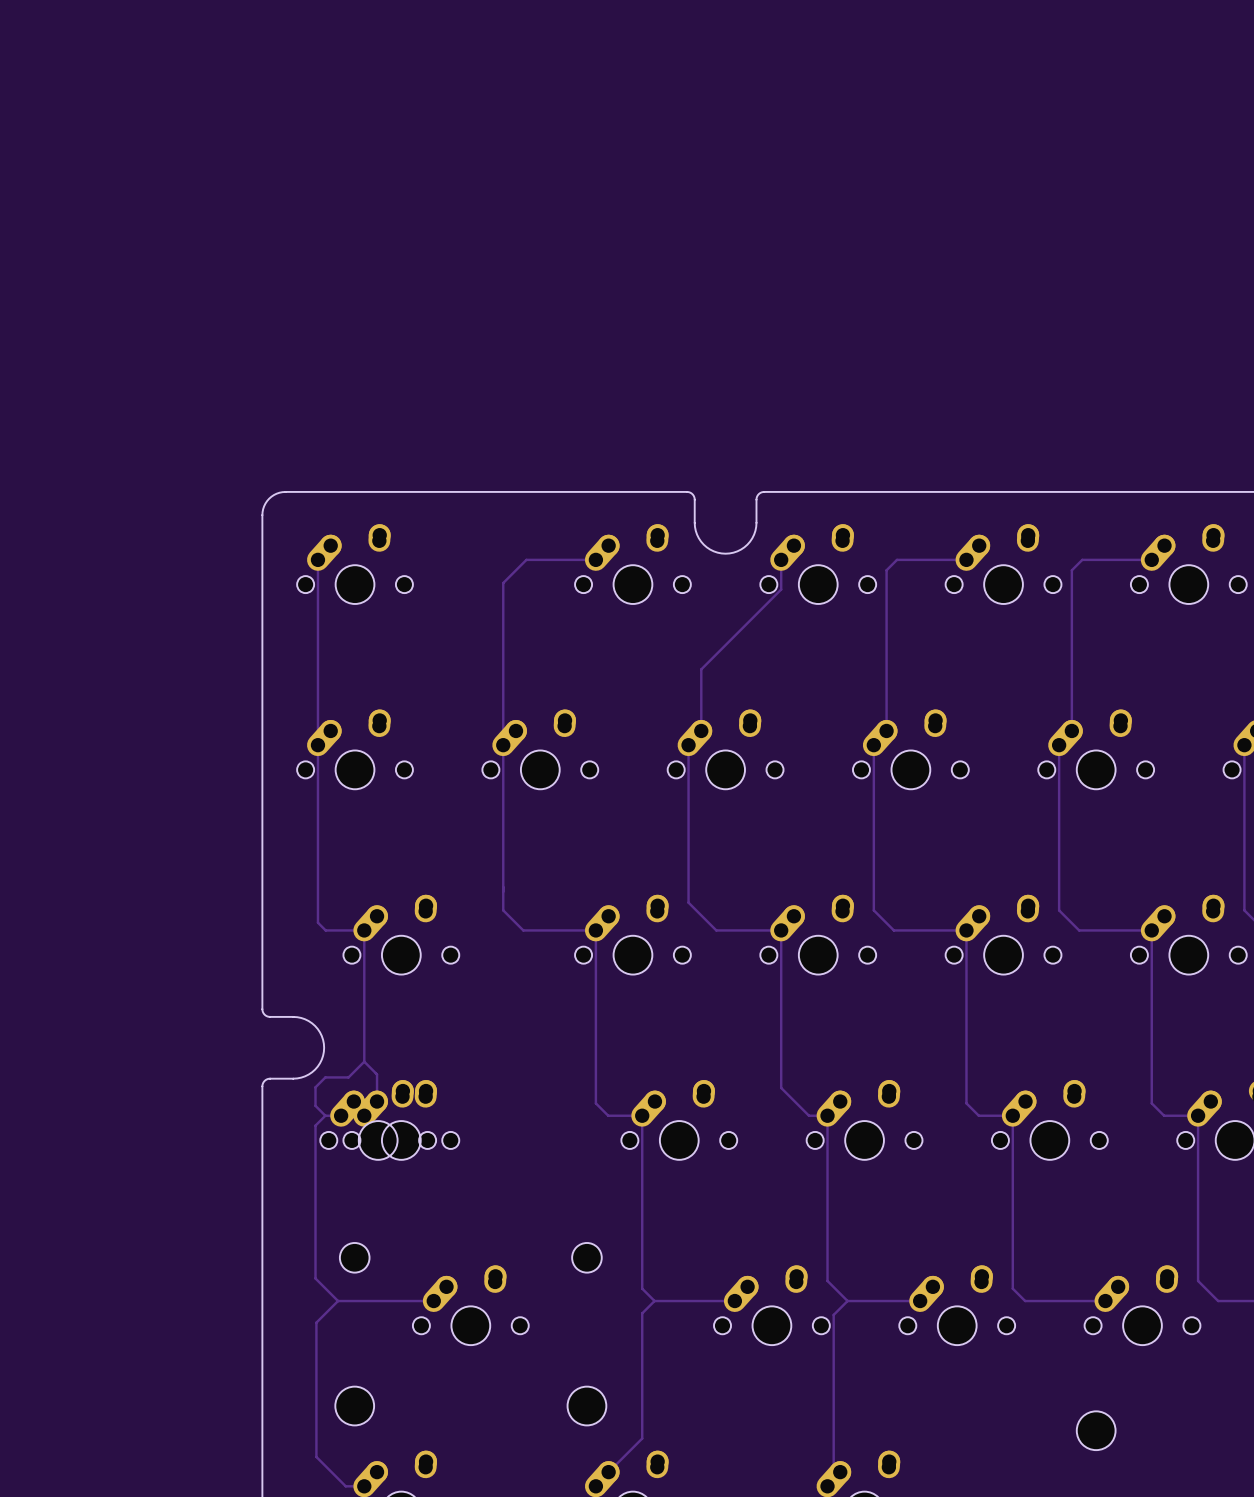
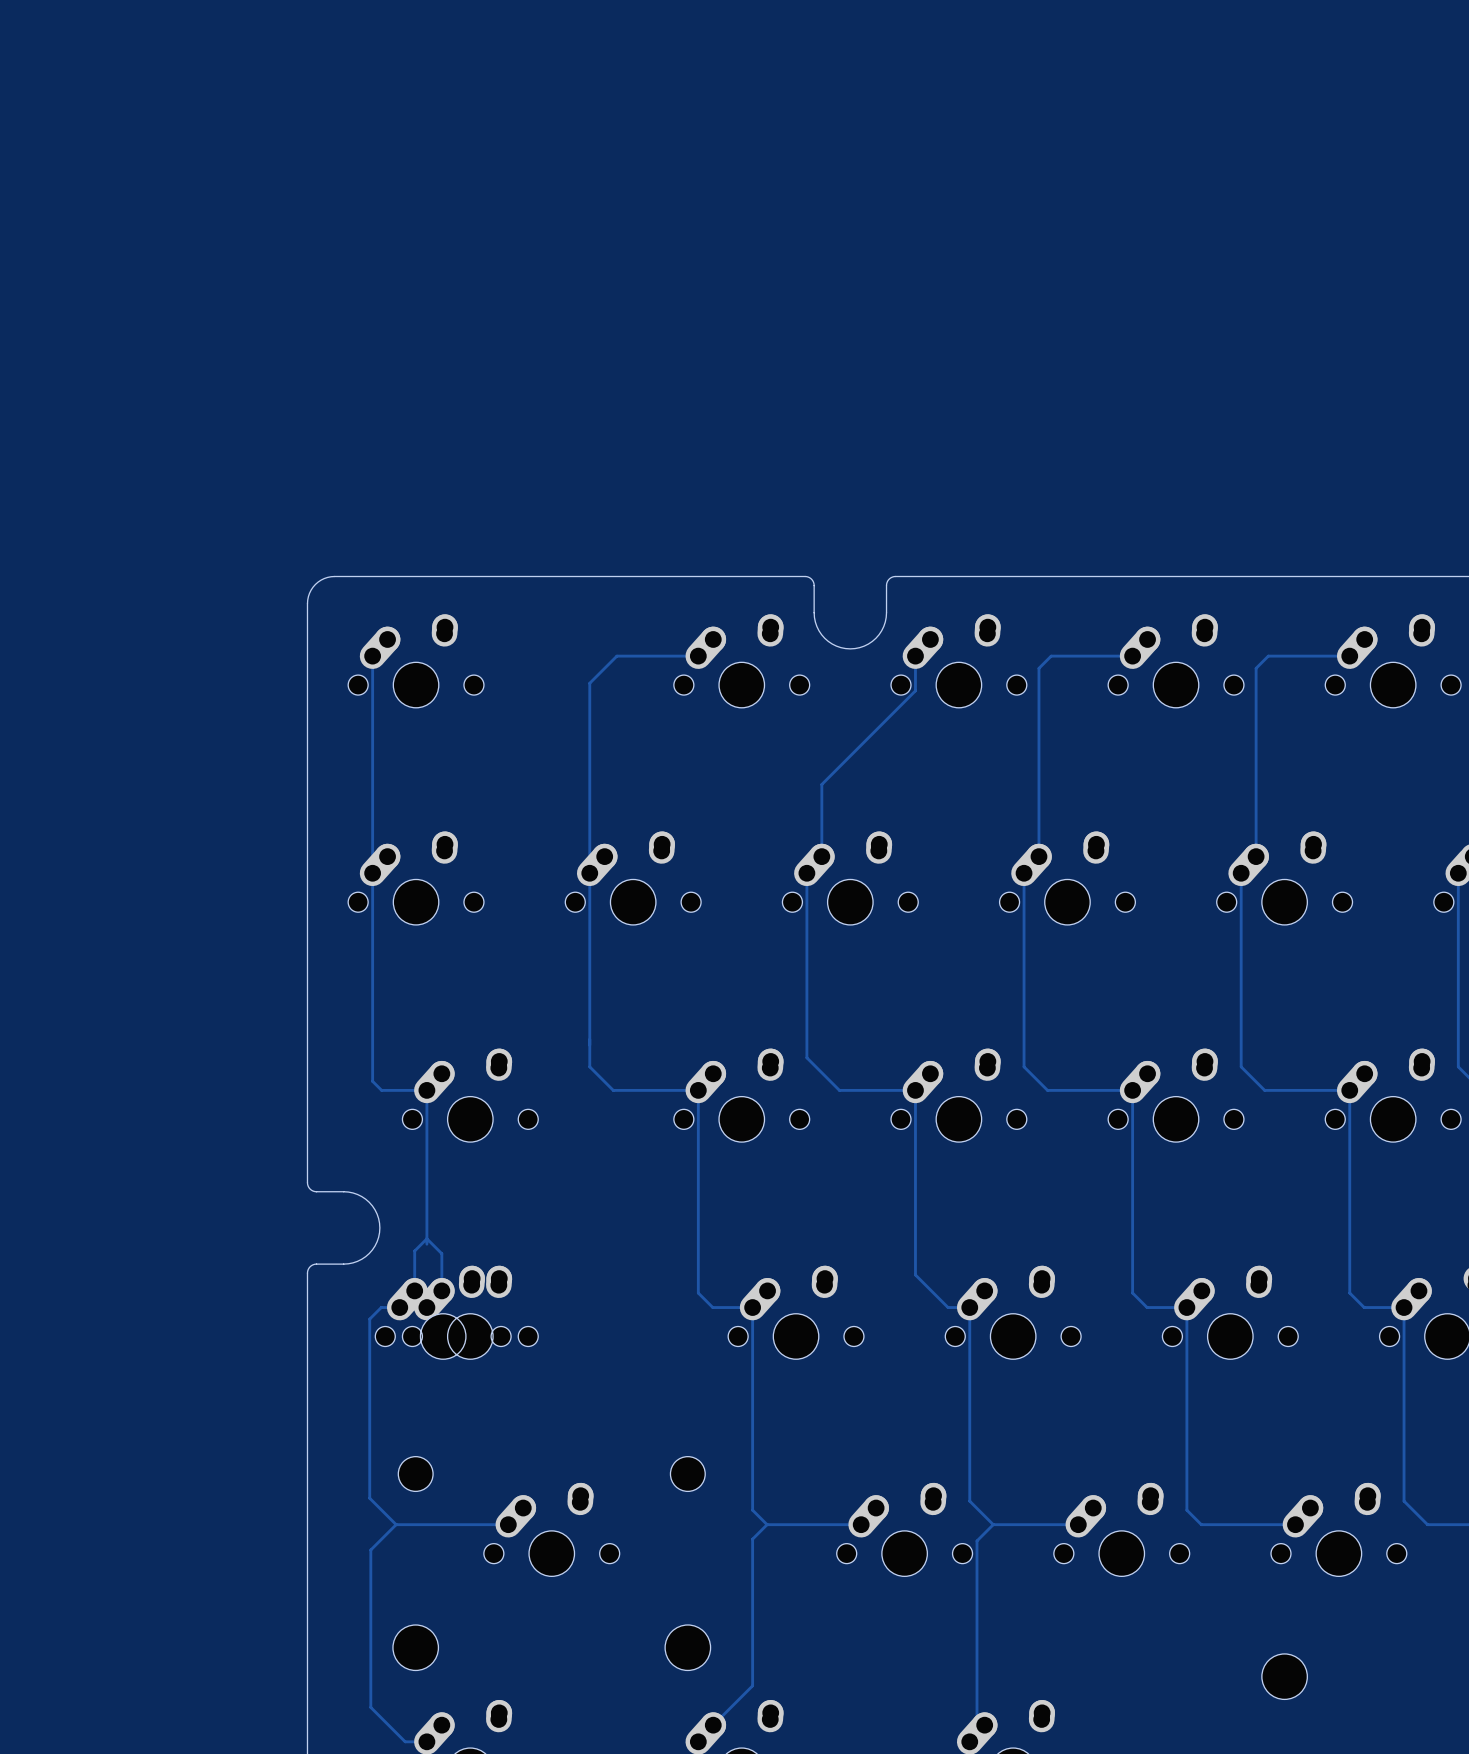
track: (377, 1074) (364, 1061) (348, 1077) (325, 1077) (315, 1087) (315, 1105) (325, 1115) -> (441, 1259) (441, 1253) (426, 1238) (414, 1250) (414, 1292) (399, 1307)

